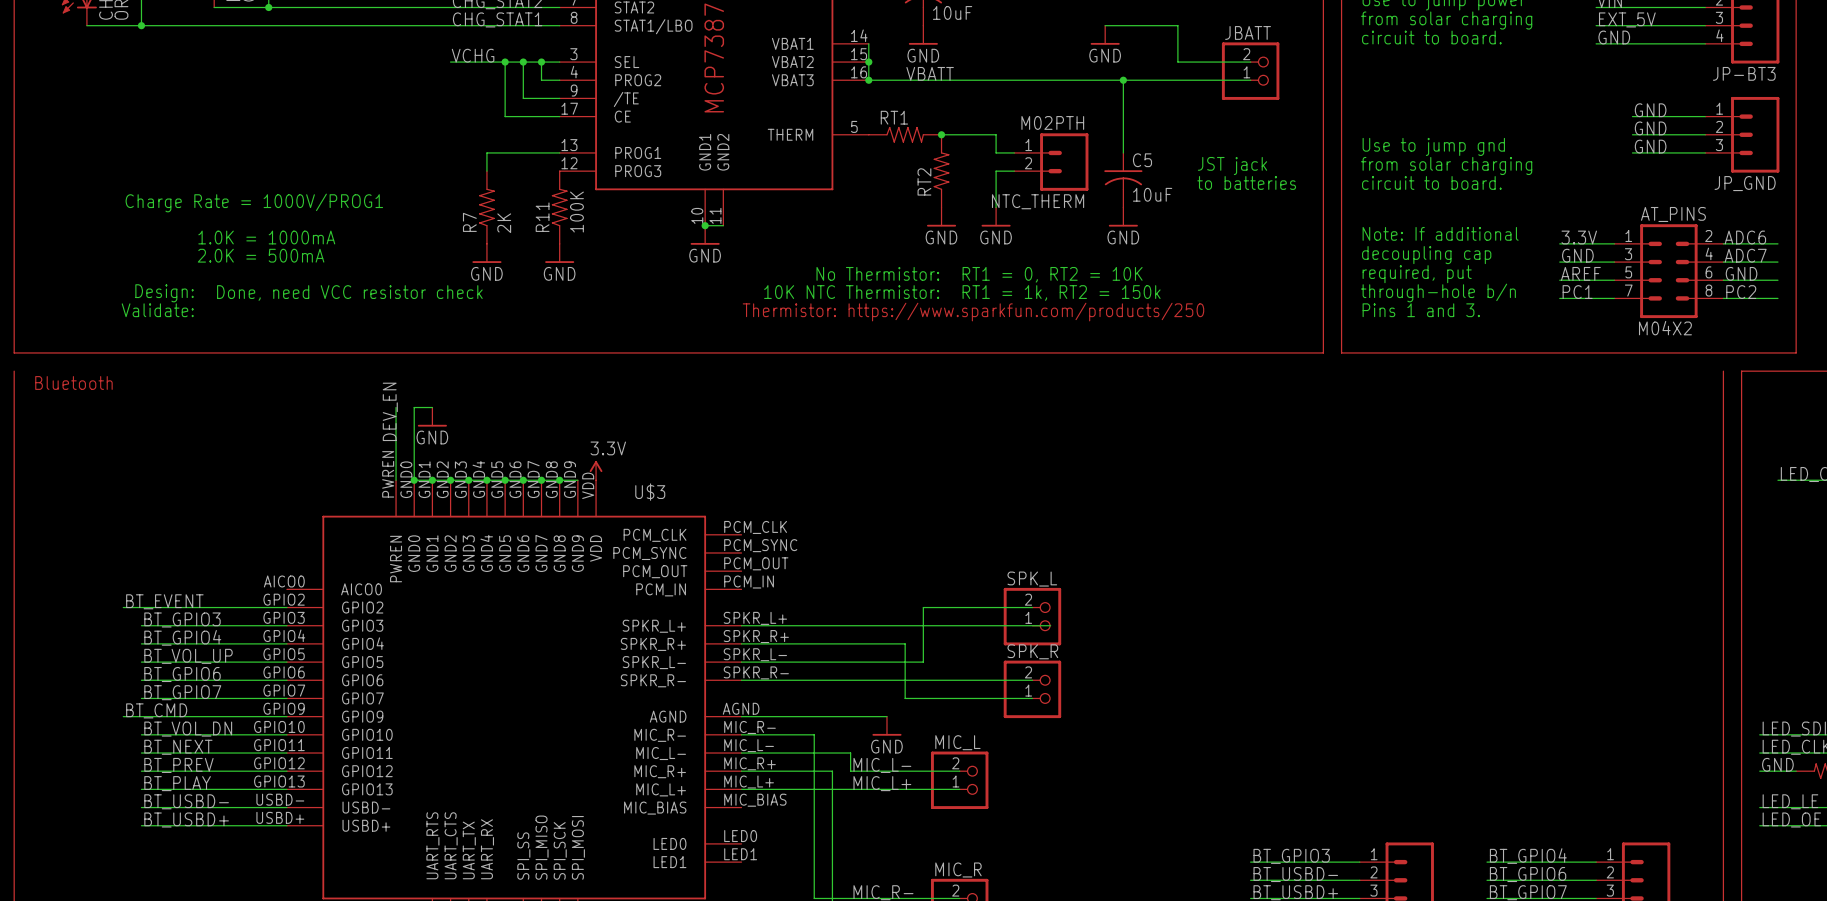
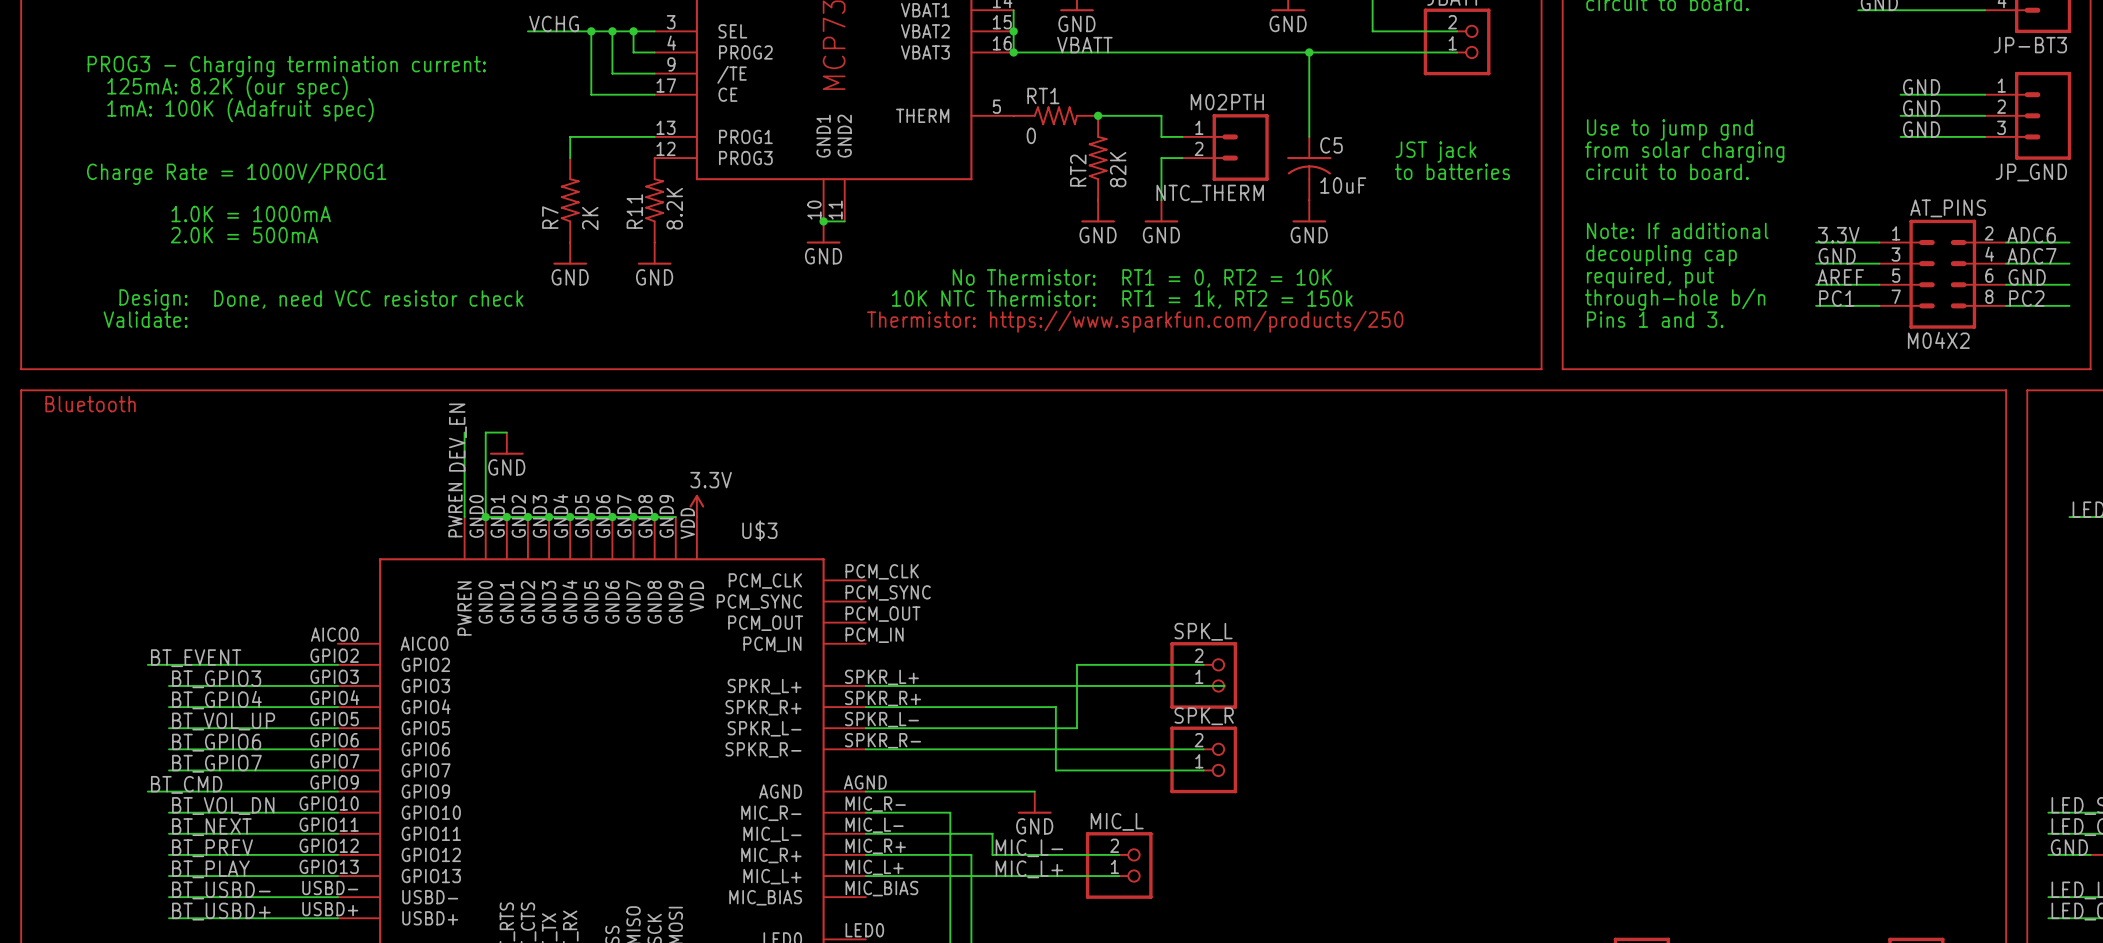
text: none -> PROG3 - Charging termination current: (286, 66)
text: none -> 125mA: 8.2K (our spec) (227, 88)
text: none -> 1mA: 100K (Adafruit spec) (240, 110)
RT1 value: none -> 0 (1031, 135)
RT2 value: none -> 82K (1118, 169)
text position: Charge Rate = 1000V/PROG1 (254, 202) -> Charge Rate = 1000V/PROG1 (236, 173)
R11 value: 100K (576, 212) -> 8.2K (674, 208)
text position: 1.0K = 1000mA (266, 237) -> 1.0K = 1000mA (251, 214)
text position: 2.0K = 500mA (261, 255) -> 2.0K = 500mA (244, 235)
text position: Done, need VCC resistor check (349, 292) -> Done, need VCC resistor check (368, 299)
text position: Design: (164, 293) -> Design: (153, 299)
text position: Validate: (157, 310) -> Validate: (145, 319)
line: none -> (21, 390) (2006, 390)

